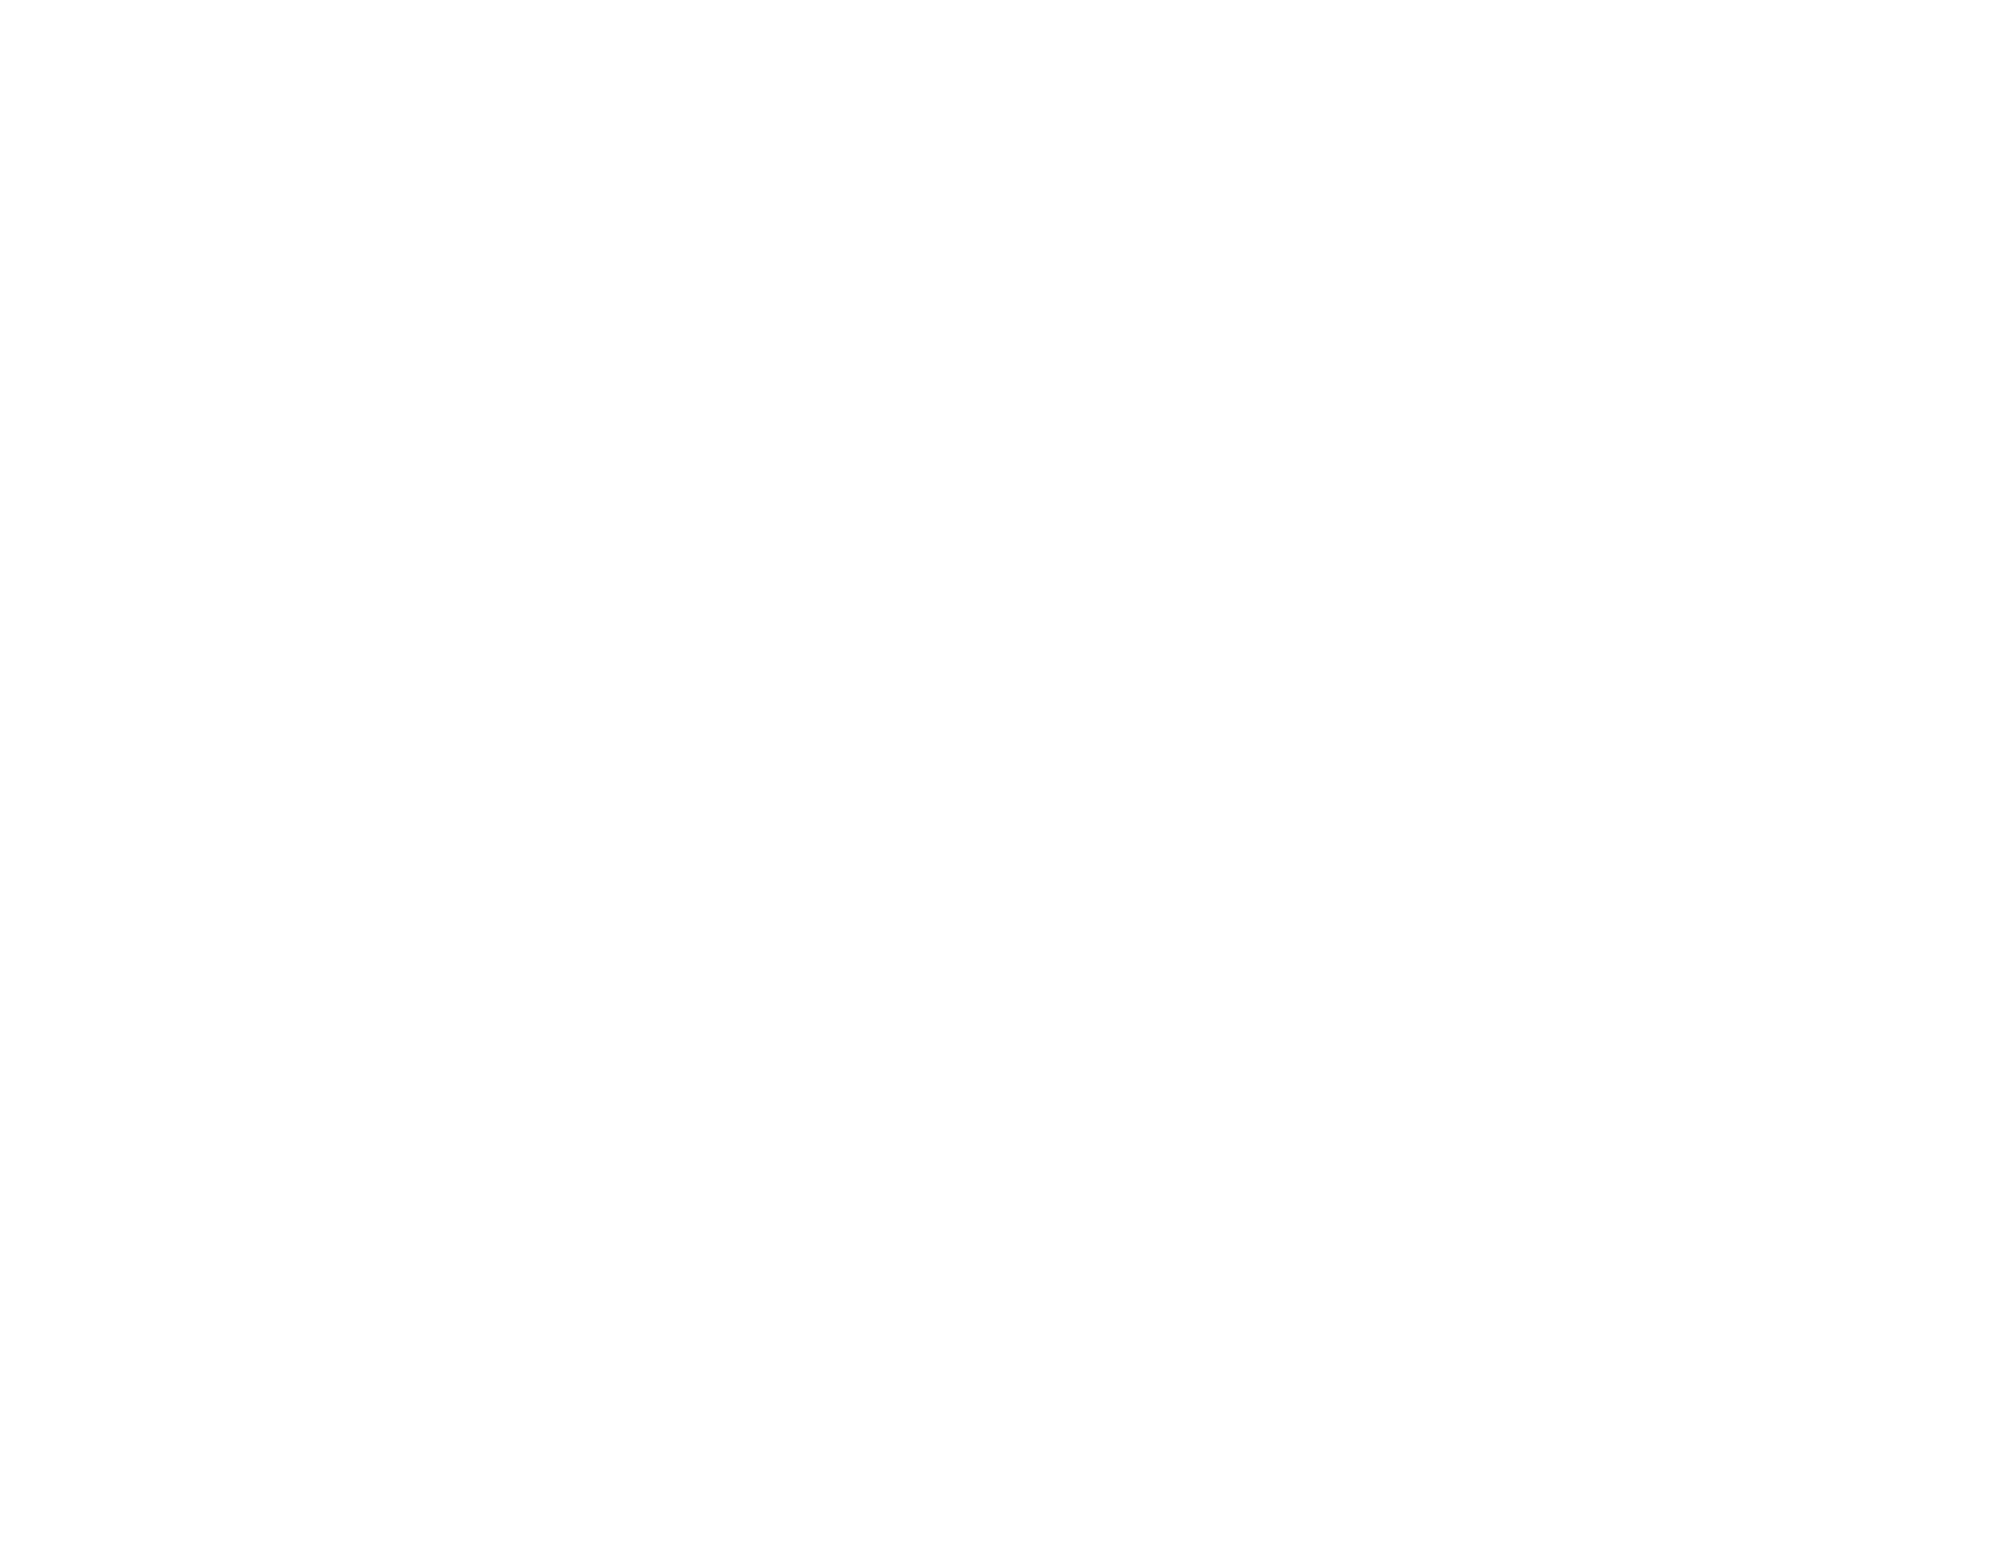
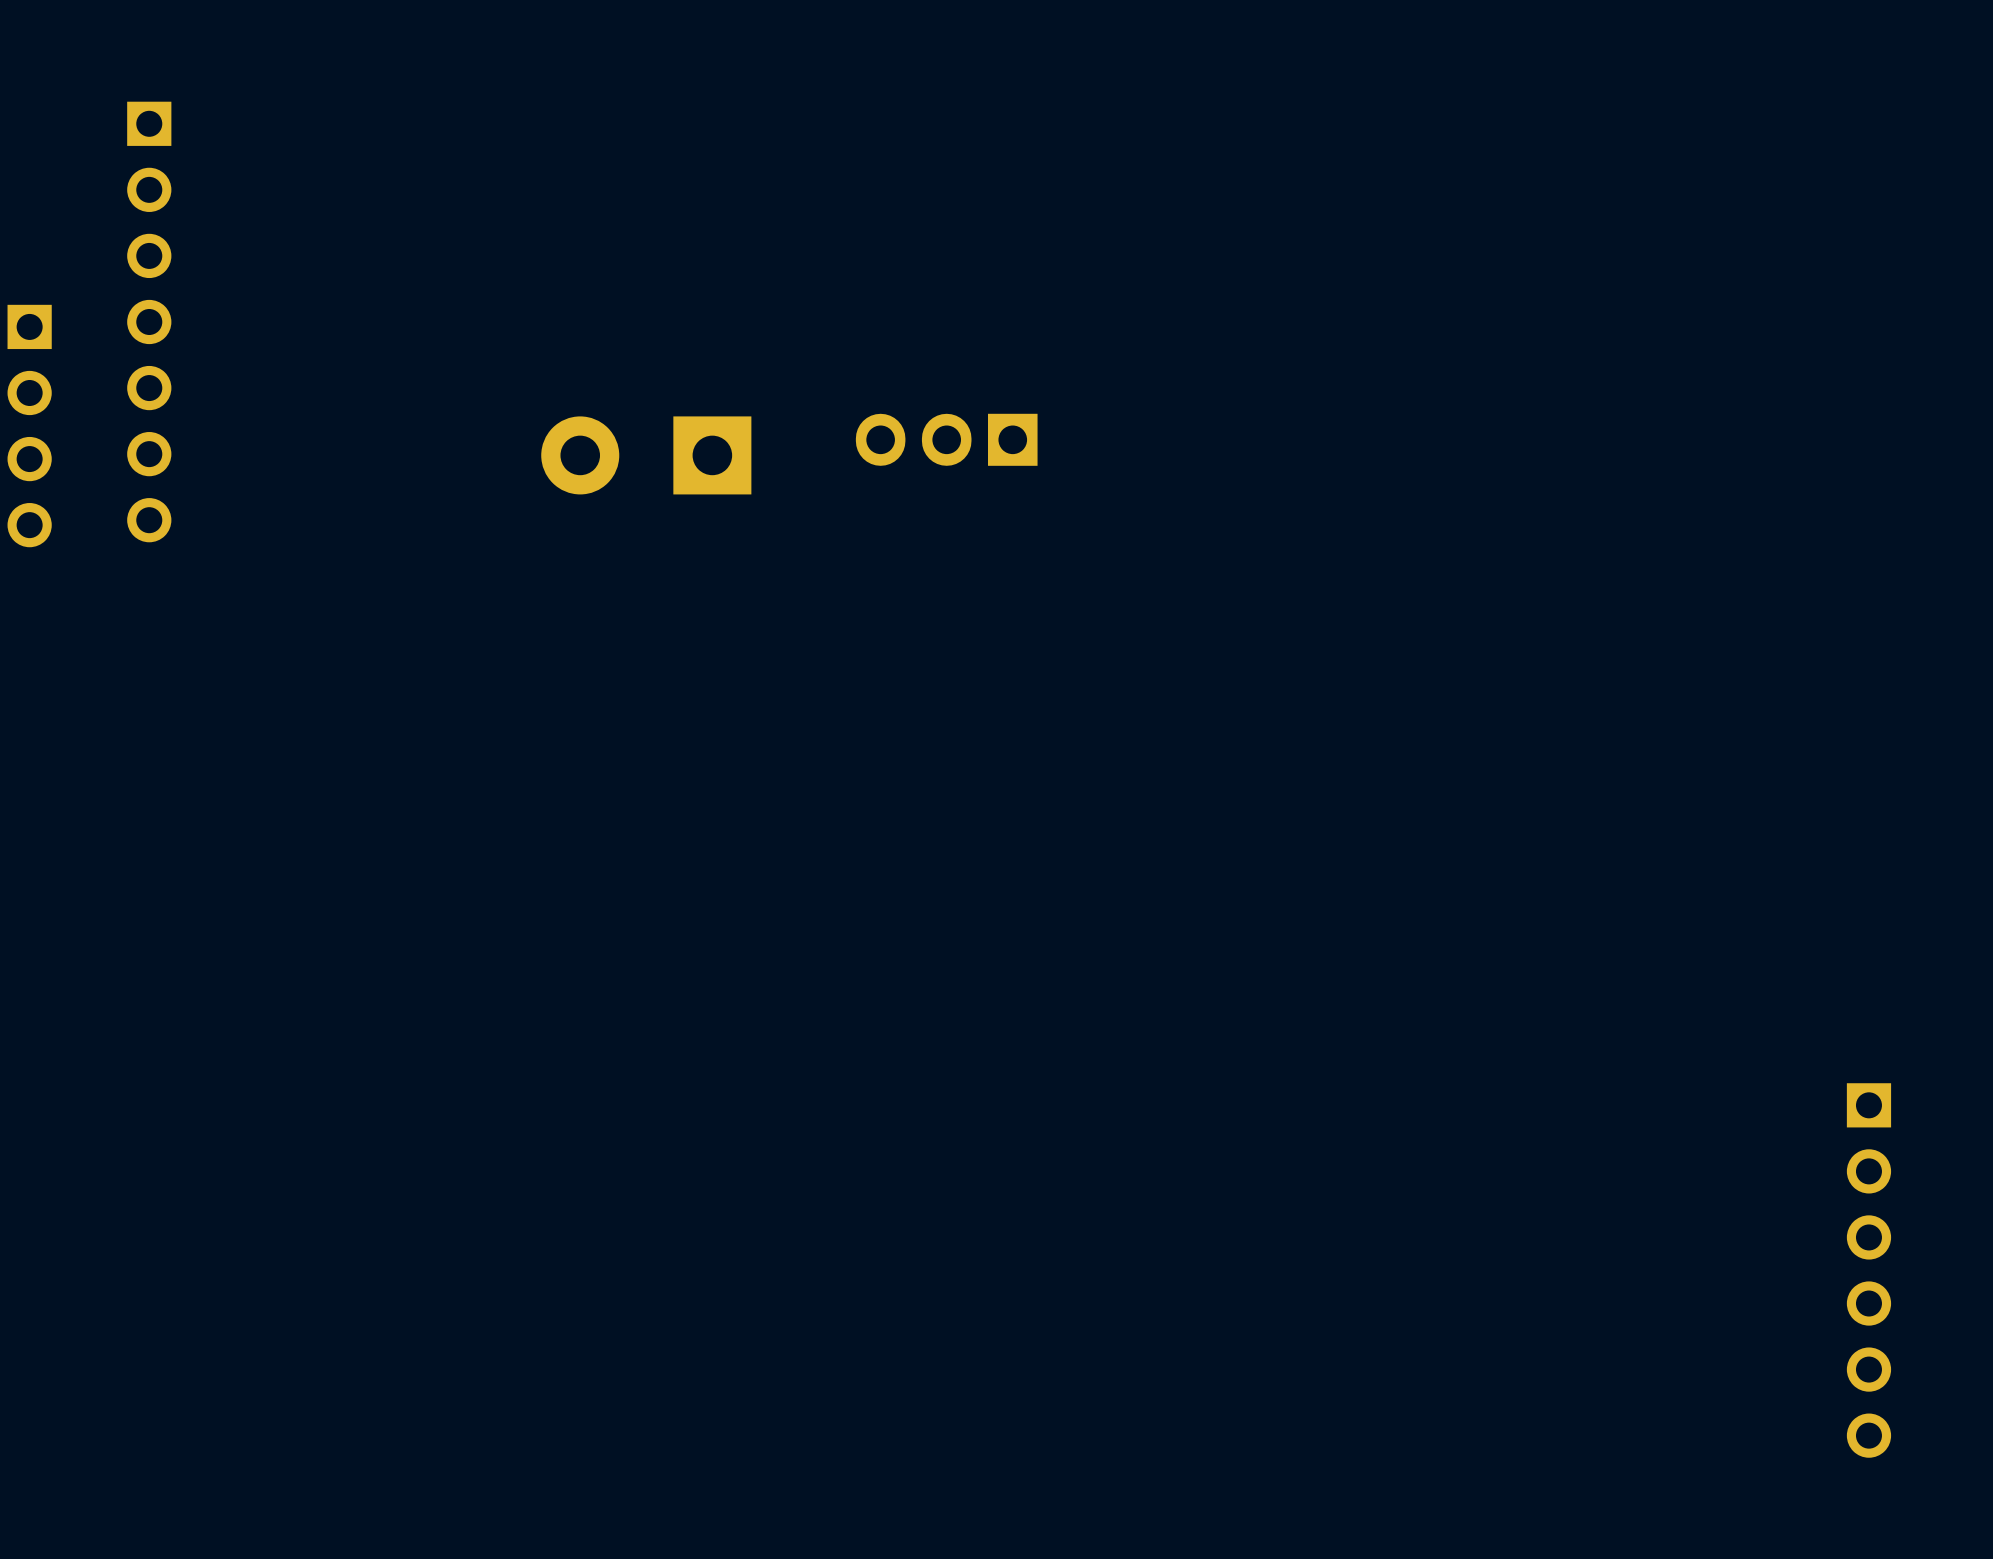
part: none -> (149, 321)
part: none -> (29, 426)
part: none -> (946, 439)
part: none -> (646, 455)
part: none -> (1868, 1270)

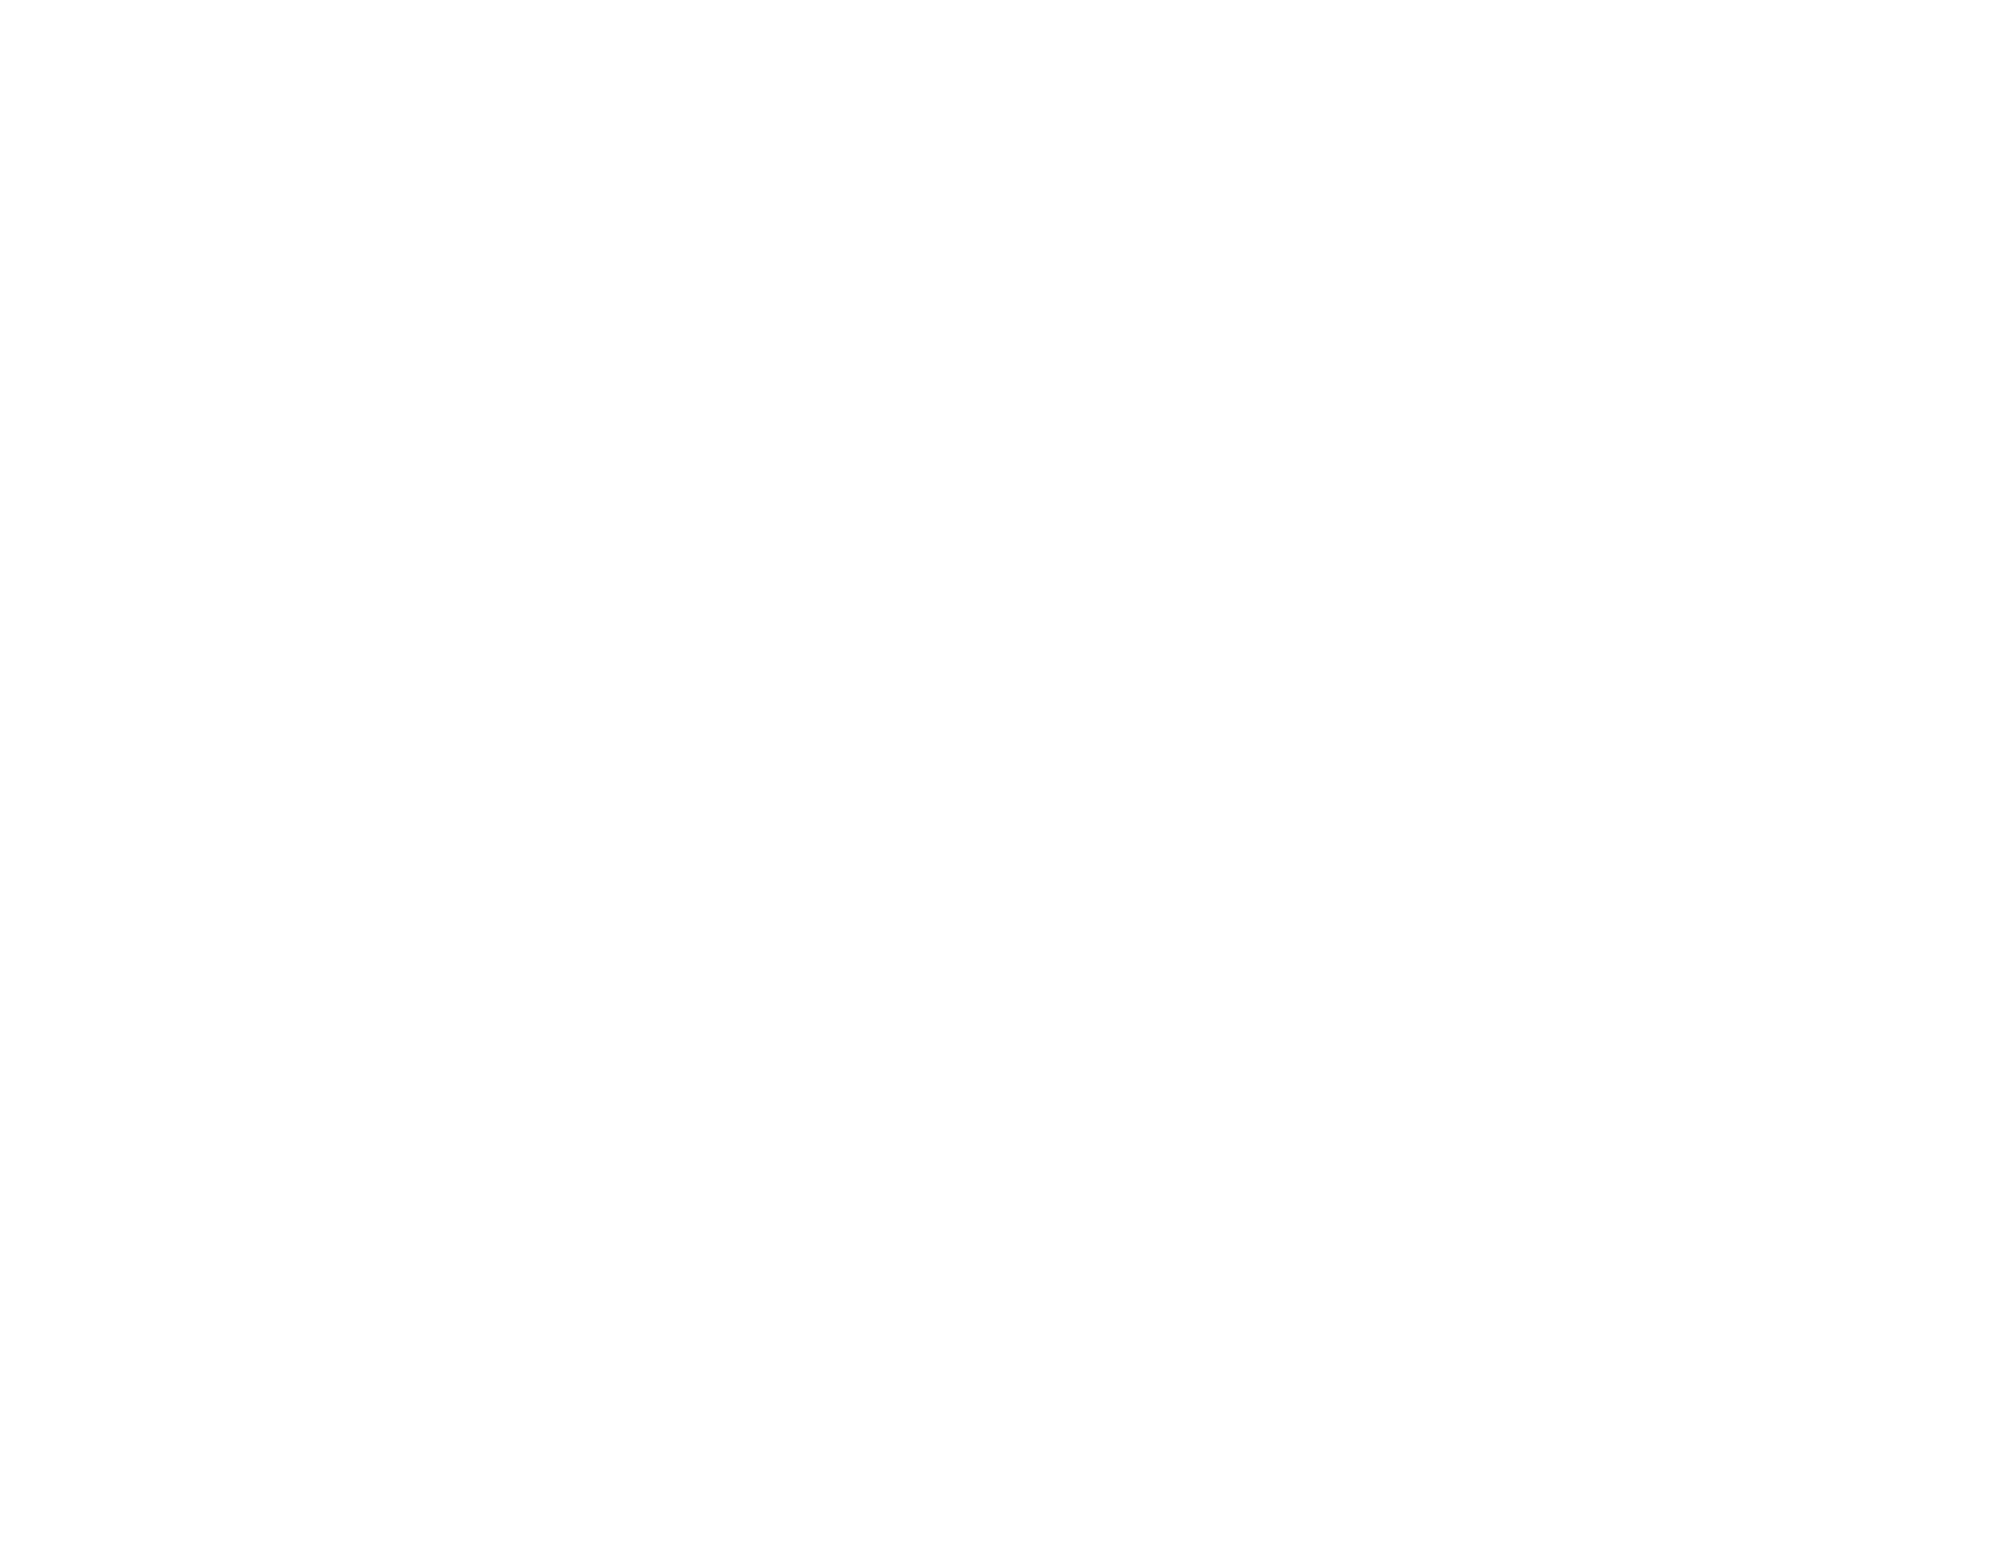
part: (149, 321) -> none
part: (29, 426) -> none
part: (946, 439) -> none
part: (646, 455) -> none
part: (1868, 1270) -> none

